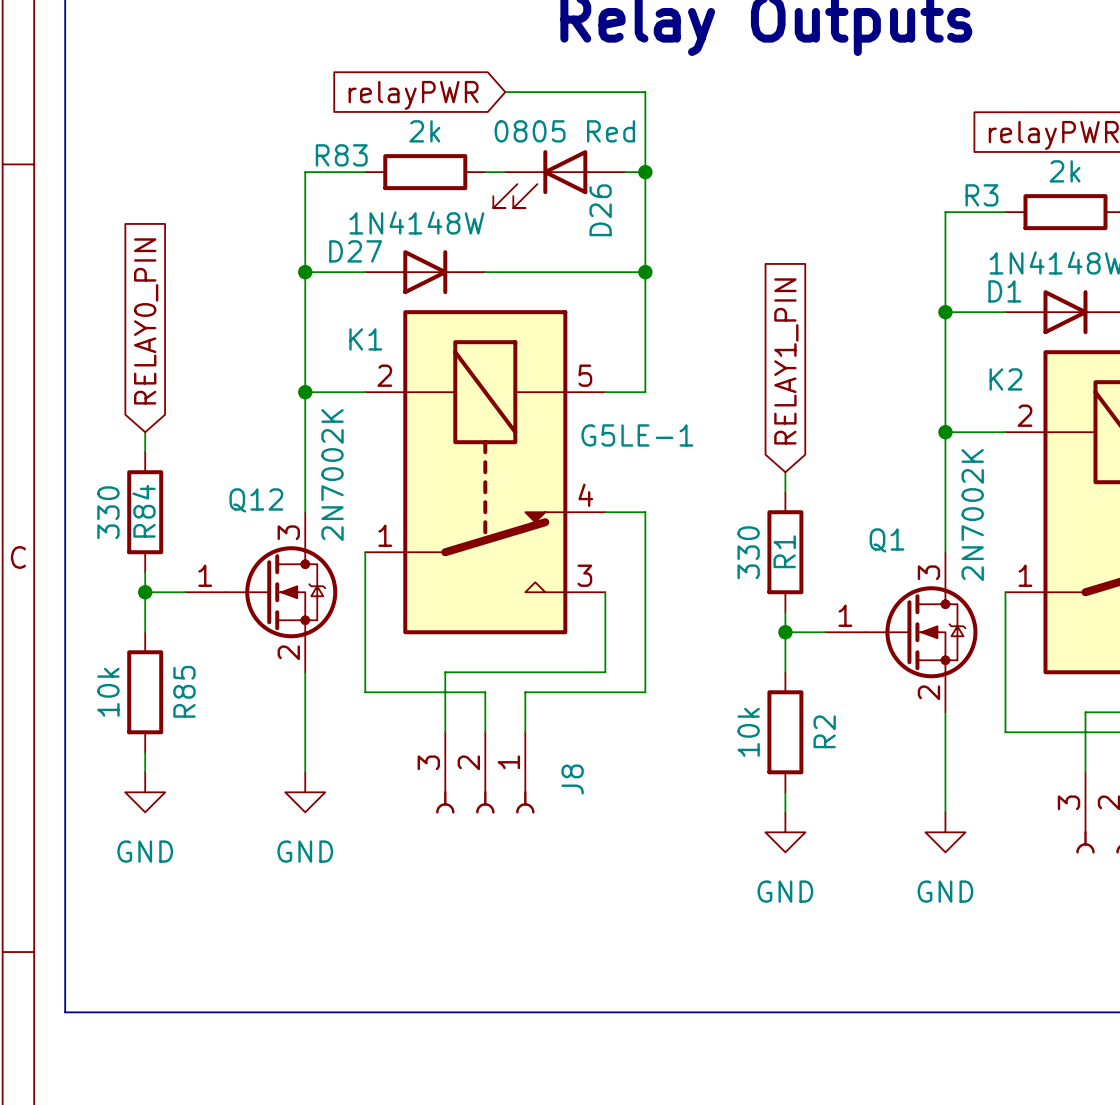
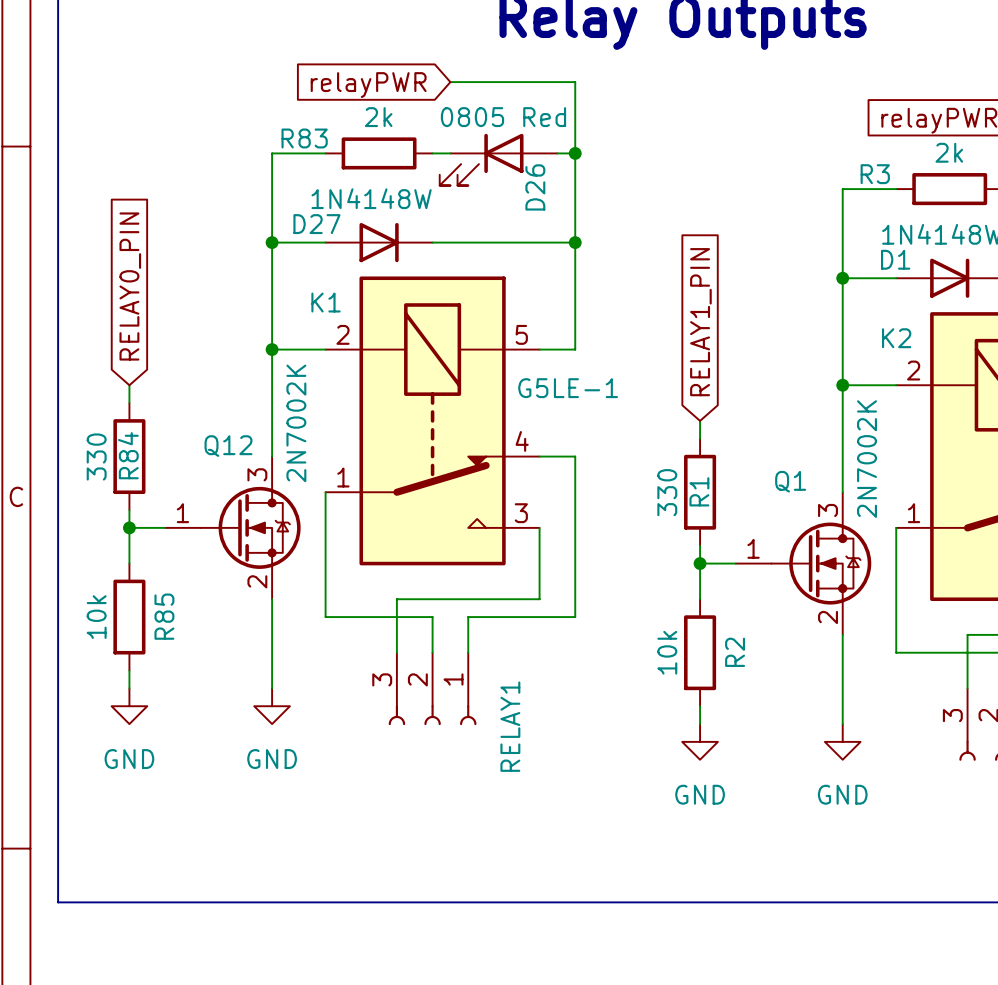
J8 name: J8 (572, 779) -> RELAY1 (510, 726)

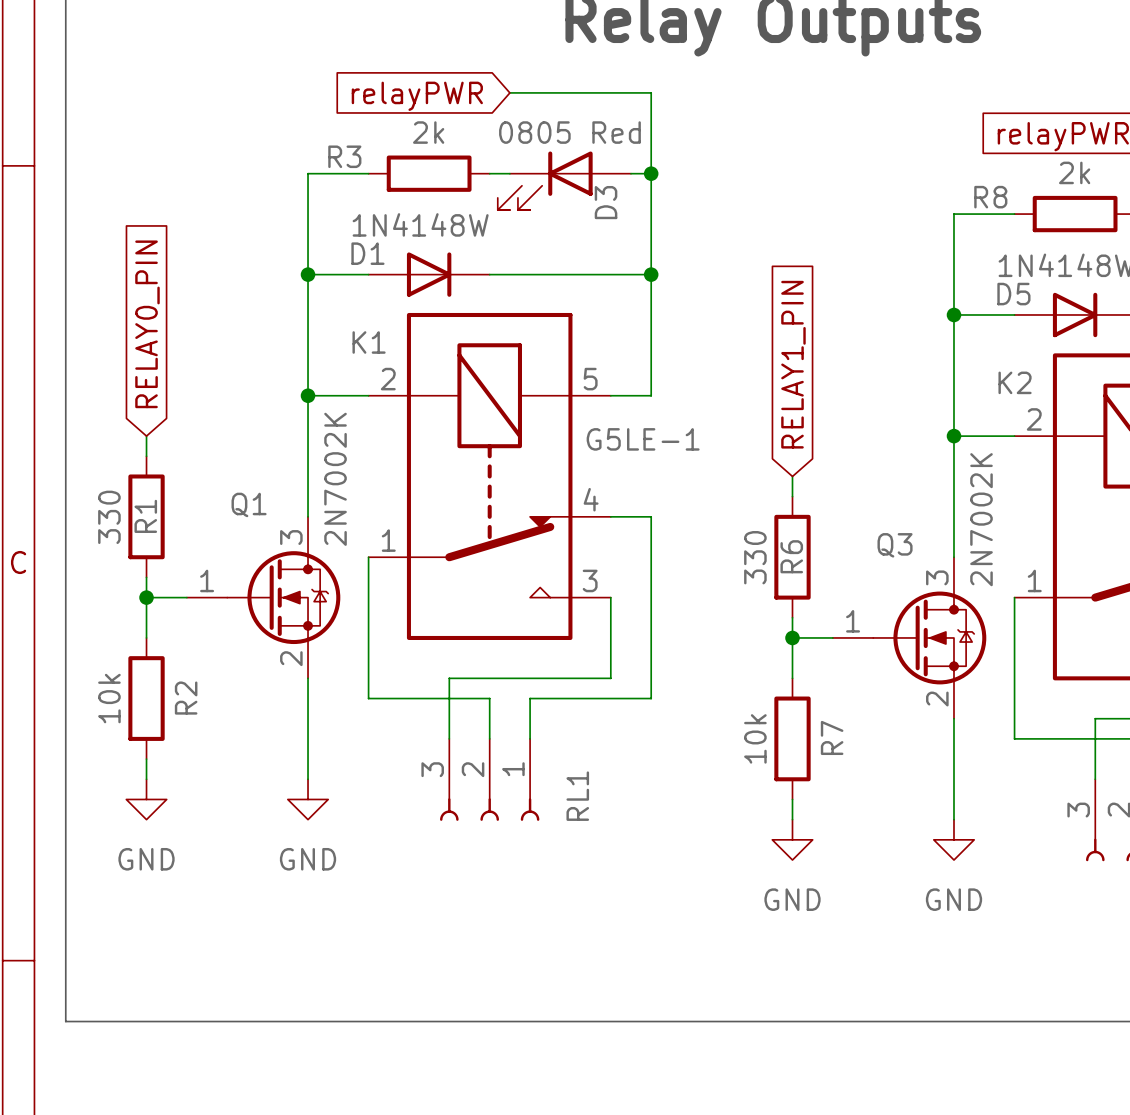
R83 name: R83 (304, 138) -> R3 (344, 156)
R3 name: R3 (875, 174) -> R8 (990, 197)
D26 name: D26 (535, 187) -> D3 (606, 202)
D27 name: D27 (316, 224) -> D1 (367, 253)
D1 name: D1 (895, 259) -> D5 (1013, 294)
Q12 name: Q12 (228, 446) -> Q1 (249, 504)
R84 name: R84 (128, 455) -> R1 (145, 516)
Q1 name: Q1 (790, 481) -> Q3 (895, 545)
R1 name: R1 (699, 491) -> R6 (791, 556)
R85 name: R85 (164, 616) -> R2 (186, 698)
R2 name: R2 (735, 652) -> R7 (832, 737)
RELAY1 name: RELAY1 (510, 726) -> RL1 (577, 796)

